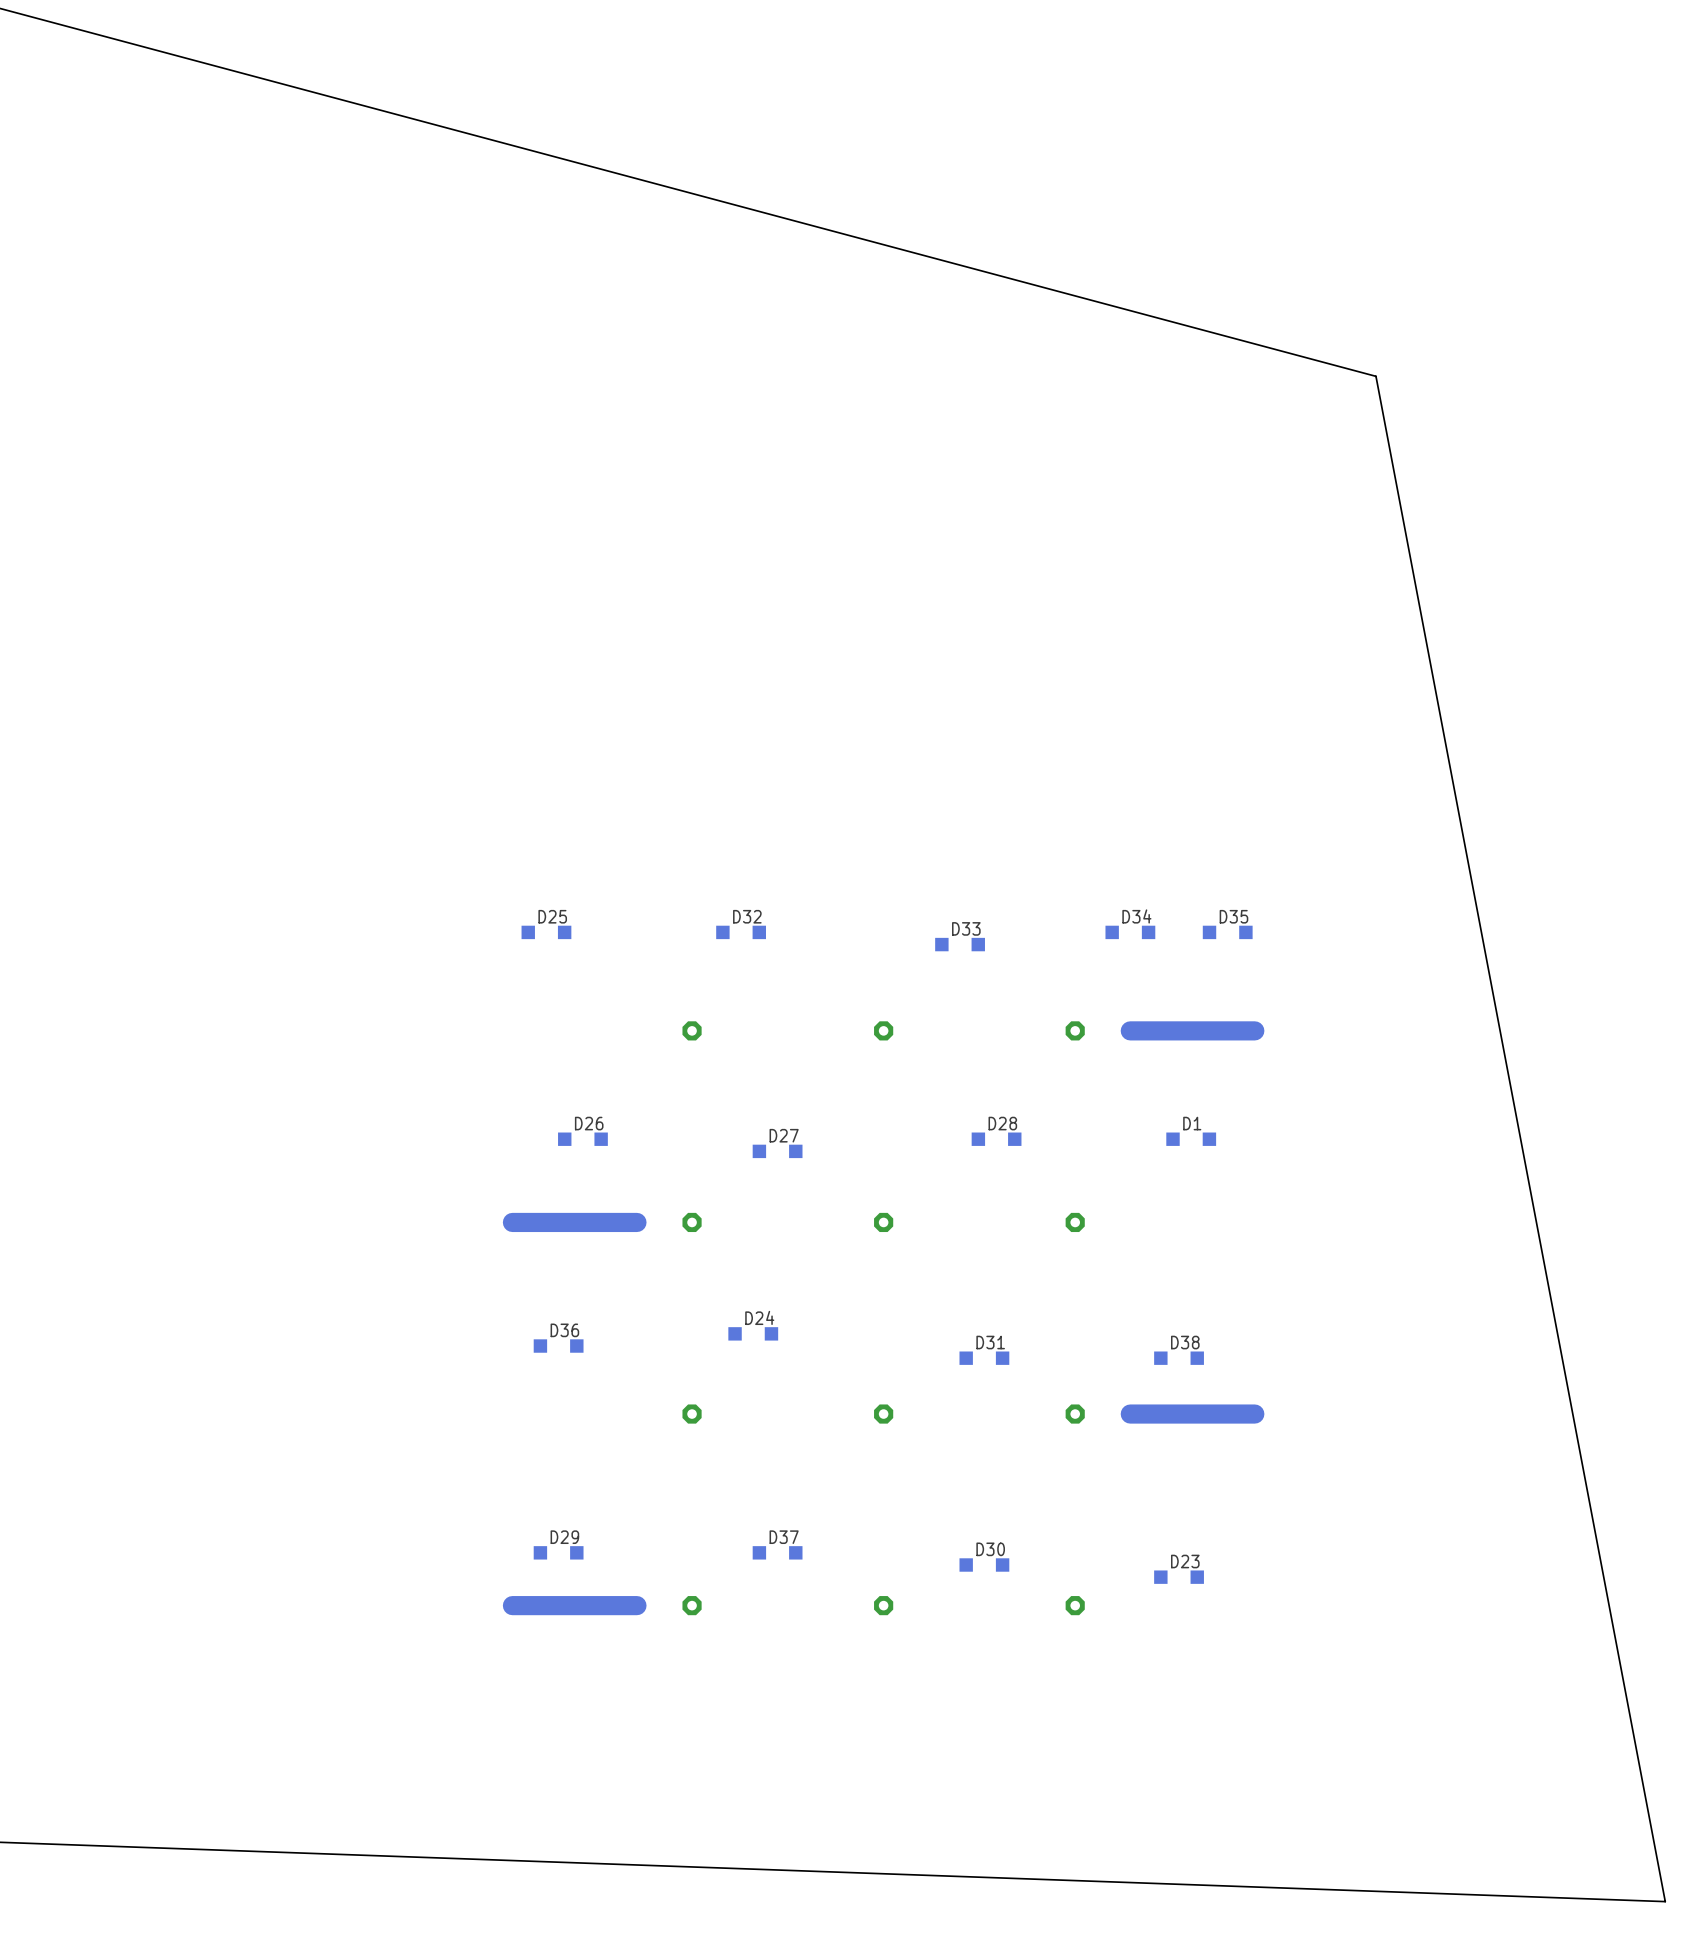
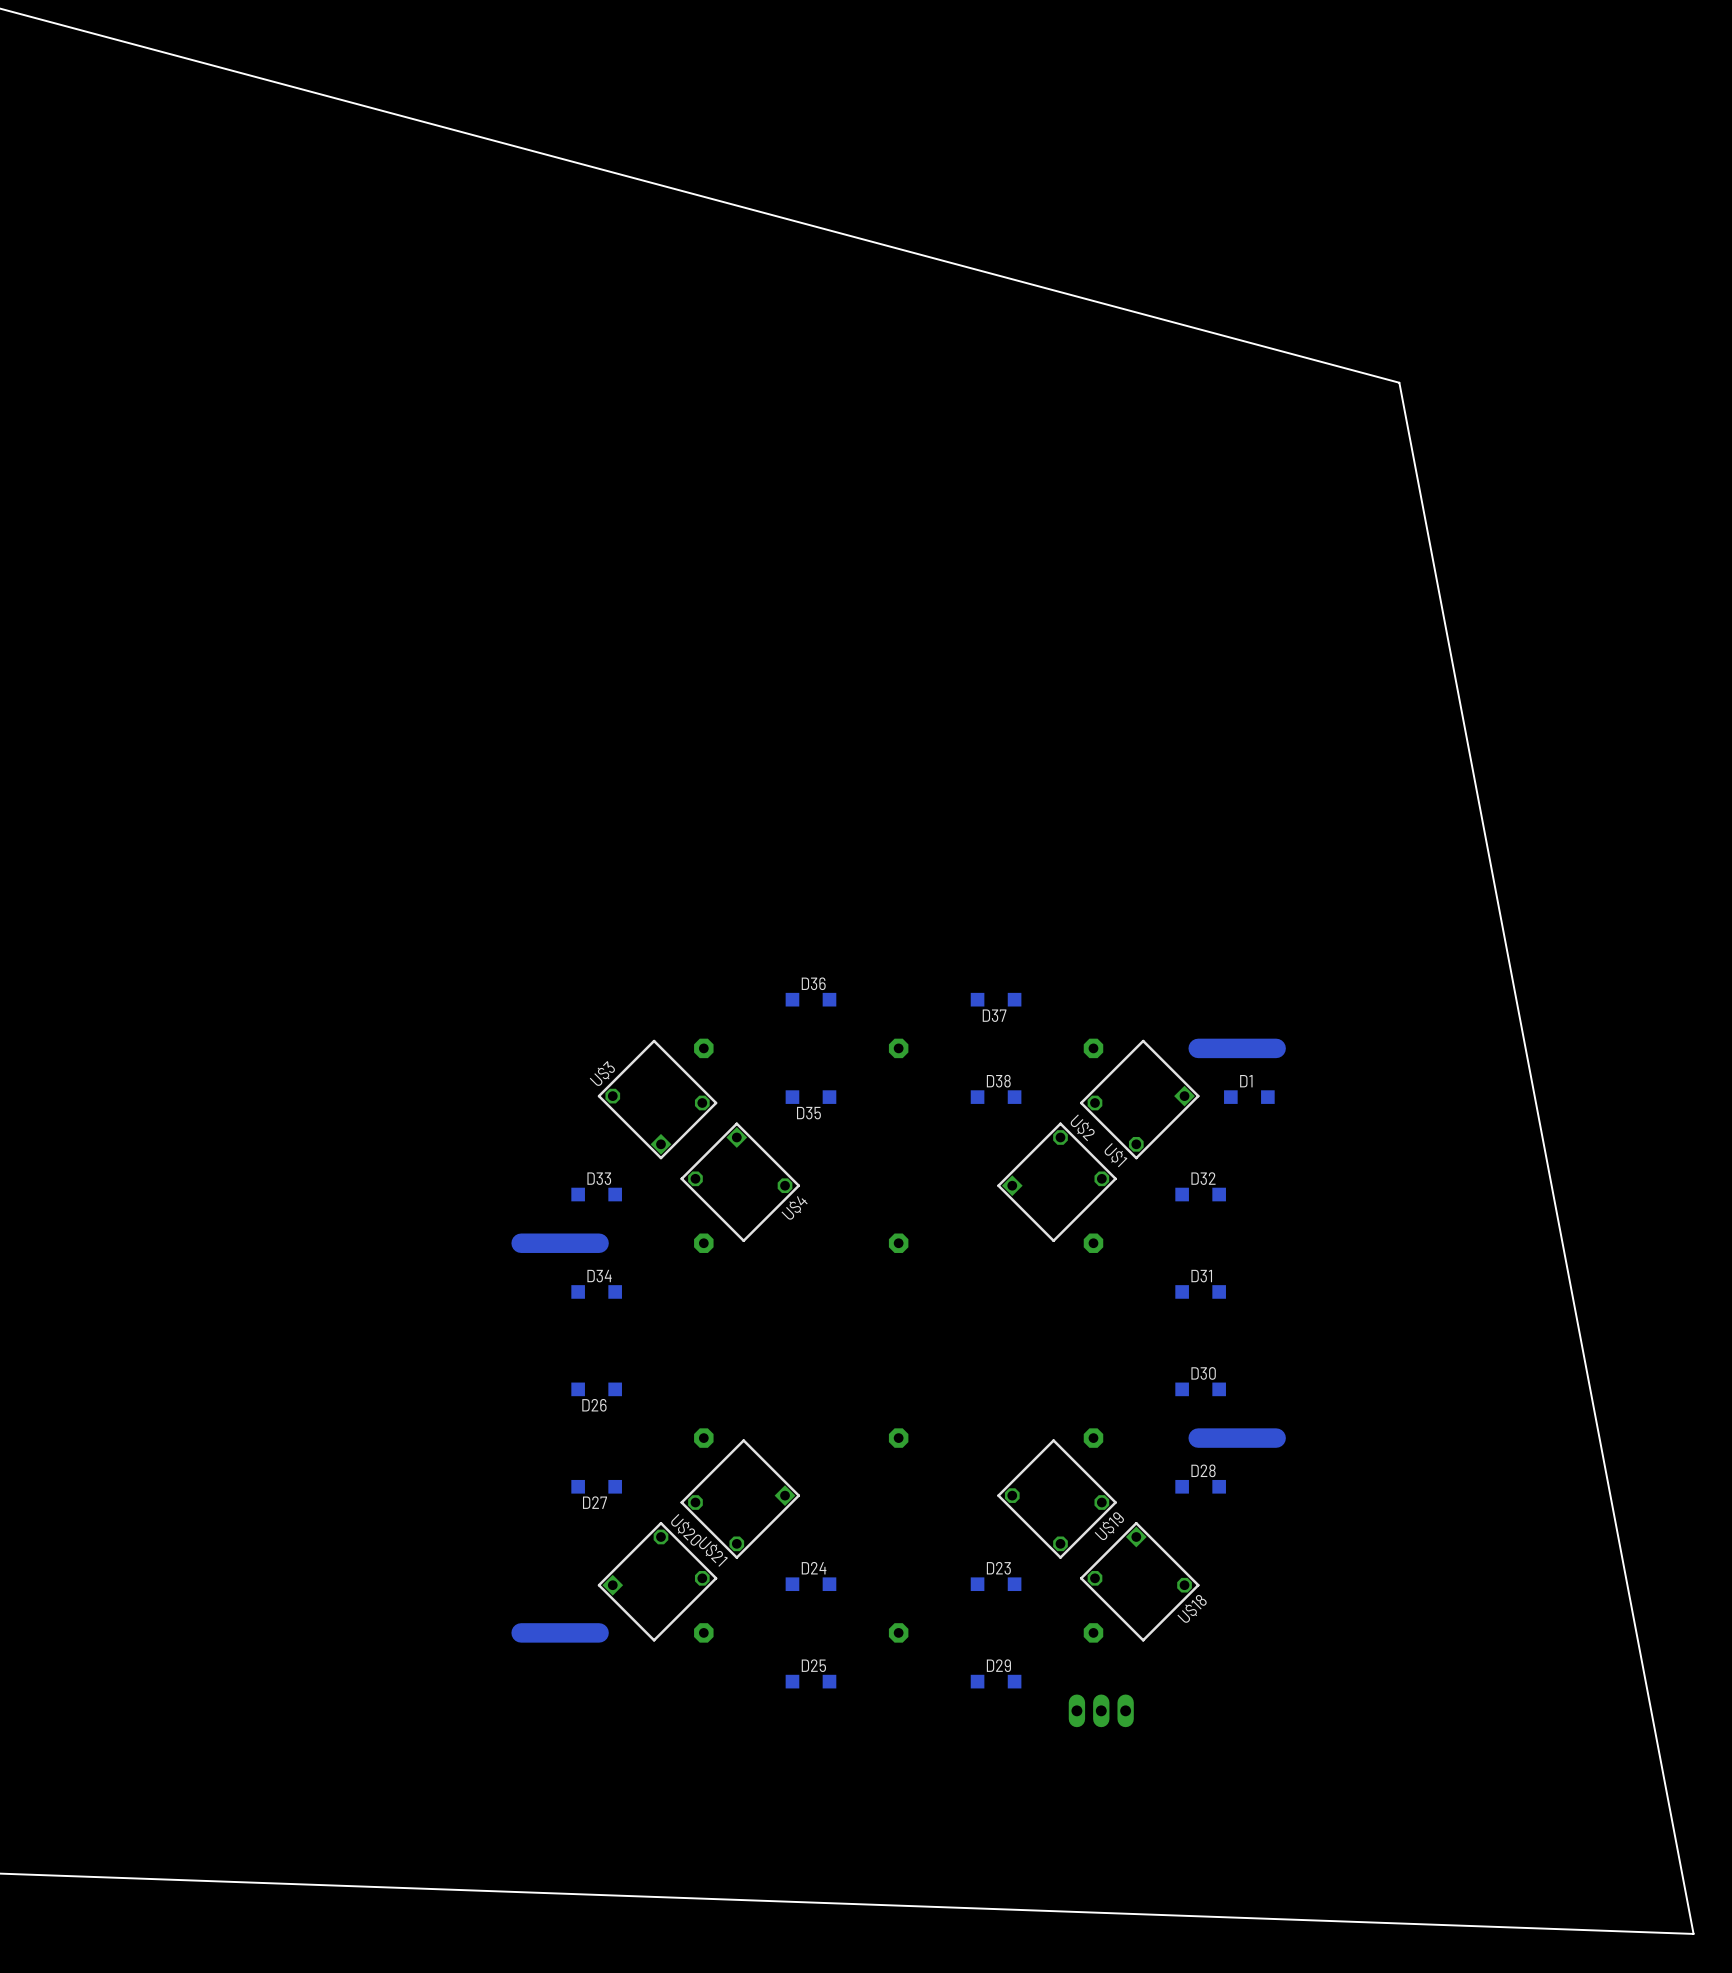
D35 name position: D35 (1233, 916) -> D35 (808, 1113)
D25 position: (546, 932) -> (810, 1681)
D32 position: (741, 932) -> (1200, 1194)
D34 position: (1130, 932) -> (596, 1291)
D35 position: (1227, 932) -> (810, 1097)
D33 position: (960, 944) -> (596, 1194)
part: (1192, 1030) -> none
part: none -> (1237, 1048)
U$3: none -> (657, 1099)
U$1: none -> (1139, 1099)
D26 name position: D26 (589, 1123) -> D26 (594, 1405)
D27 name position: D27 (784, 1135) -> D27 (595, 1502)
D26 position: (582, 1139) -> (596, 1389)
D28 position: (996, 1139) -> (1200, 1486)
D1 position: (1191, 1139) -> (1249, 1097)
D27 position: (777, 1151) -> (596, 1486)
U$4: none -> (740, 1182)
U$2: none -> (1057, 1182)
part: none -> (560, 1243)
part: (574, 1222) -> none
D24 position: (753, 1333) -> (810, 1584)
D36 position: (558, 1346) -> (810, 999)
D31 position: (984, 1358) -> (1200, 1291)
D38 position: (1179, 1358) -> (996, 1097)
part: (1192, 1414) -> none
part: none -> (1237, 1438)
U$21: none -> (740, 1499)
U$19: none -> (1057, 1499)
D37 name position: D37 (784, 1537) -> D37 (994, 1015)
D29 position: (558, 1552) -> (996, 1681)
D37 position: (777, 1552) -> (996, 999)
U$20: none -> (657, 1581)
U$18: none -> (1139, 1581)
D30 position: (984, 1565) -> (1200, 1389)
D23 position: (1179, 1577) -> (996, 1584)
part: none -> (560, 1632)
part: (574, 1605) -> none
part: none -> (1101, 1710)

